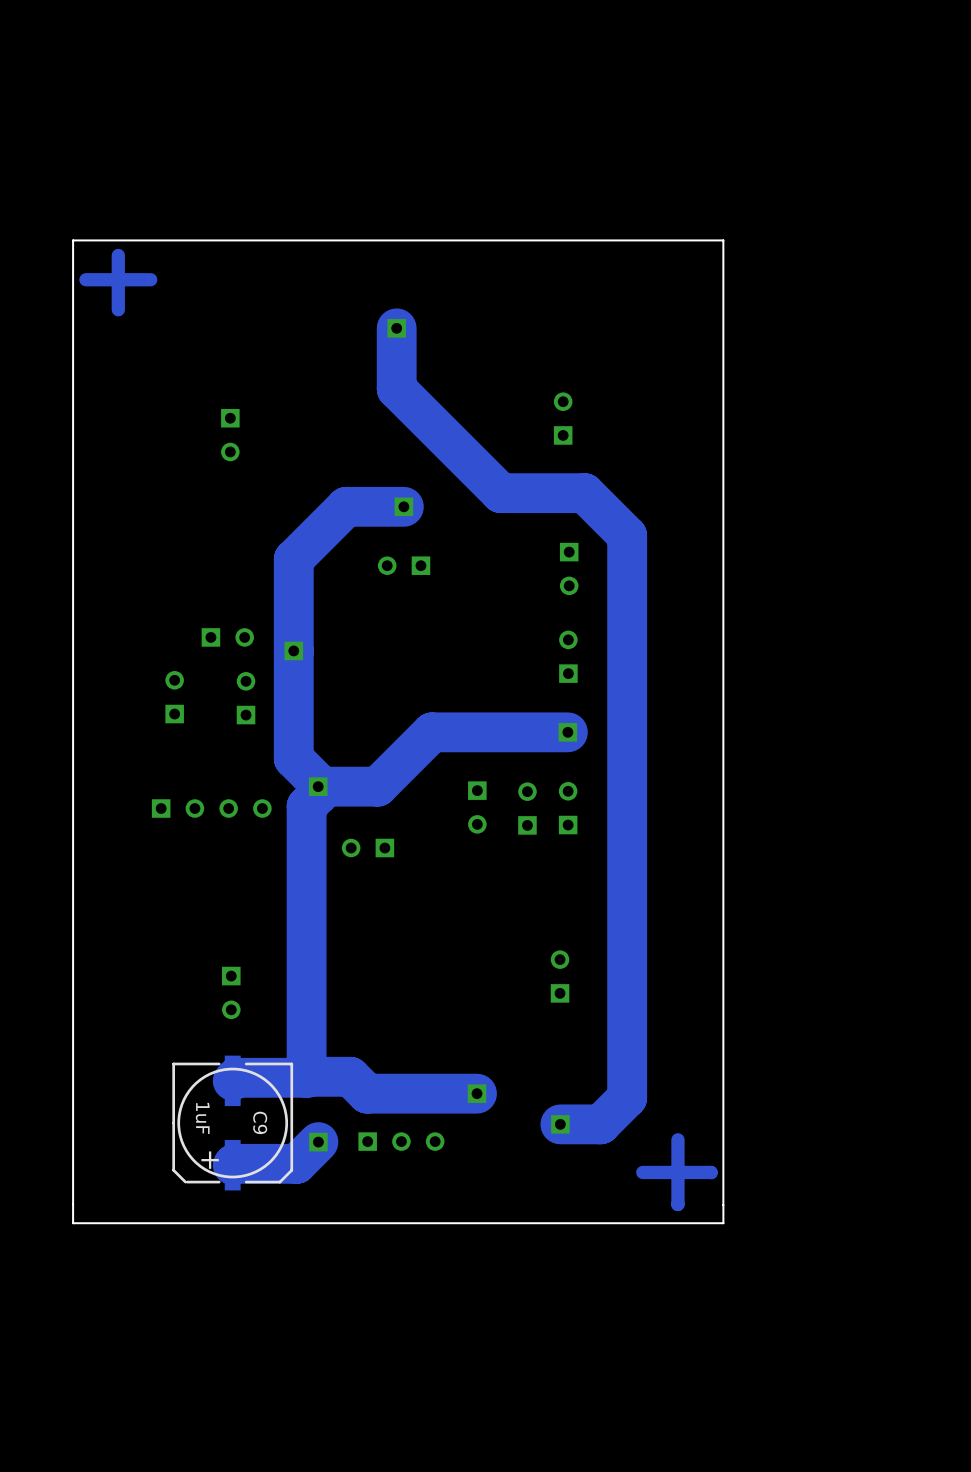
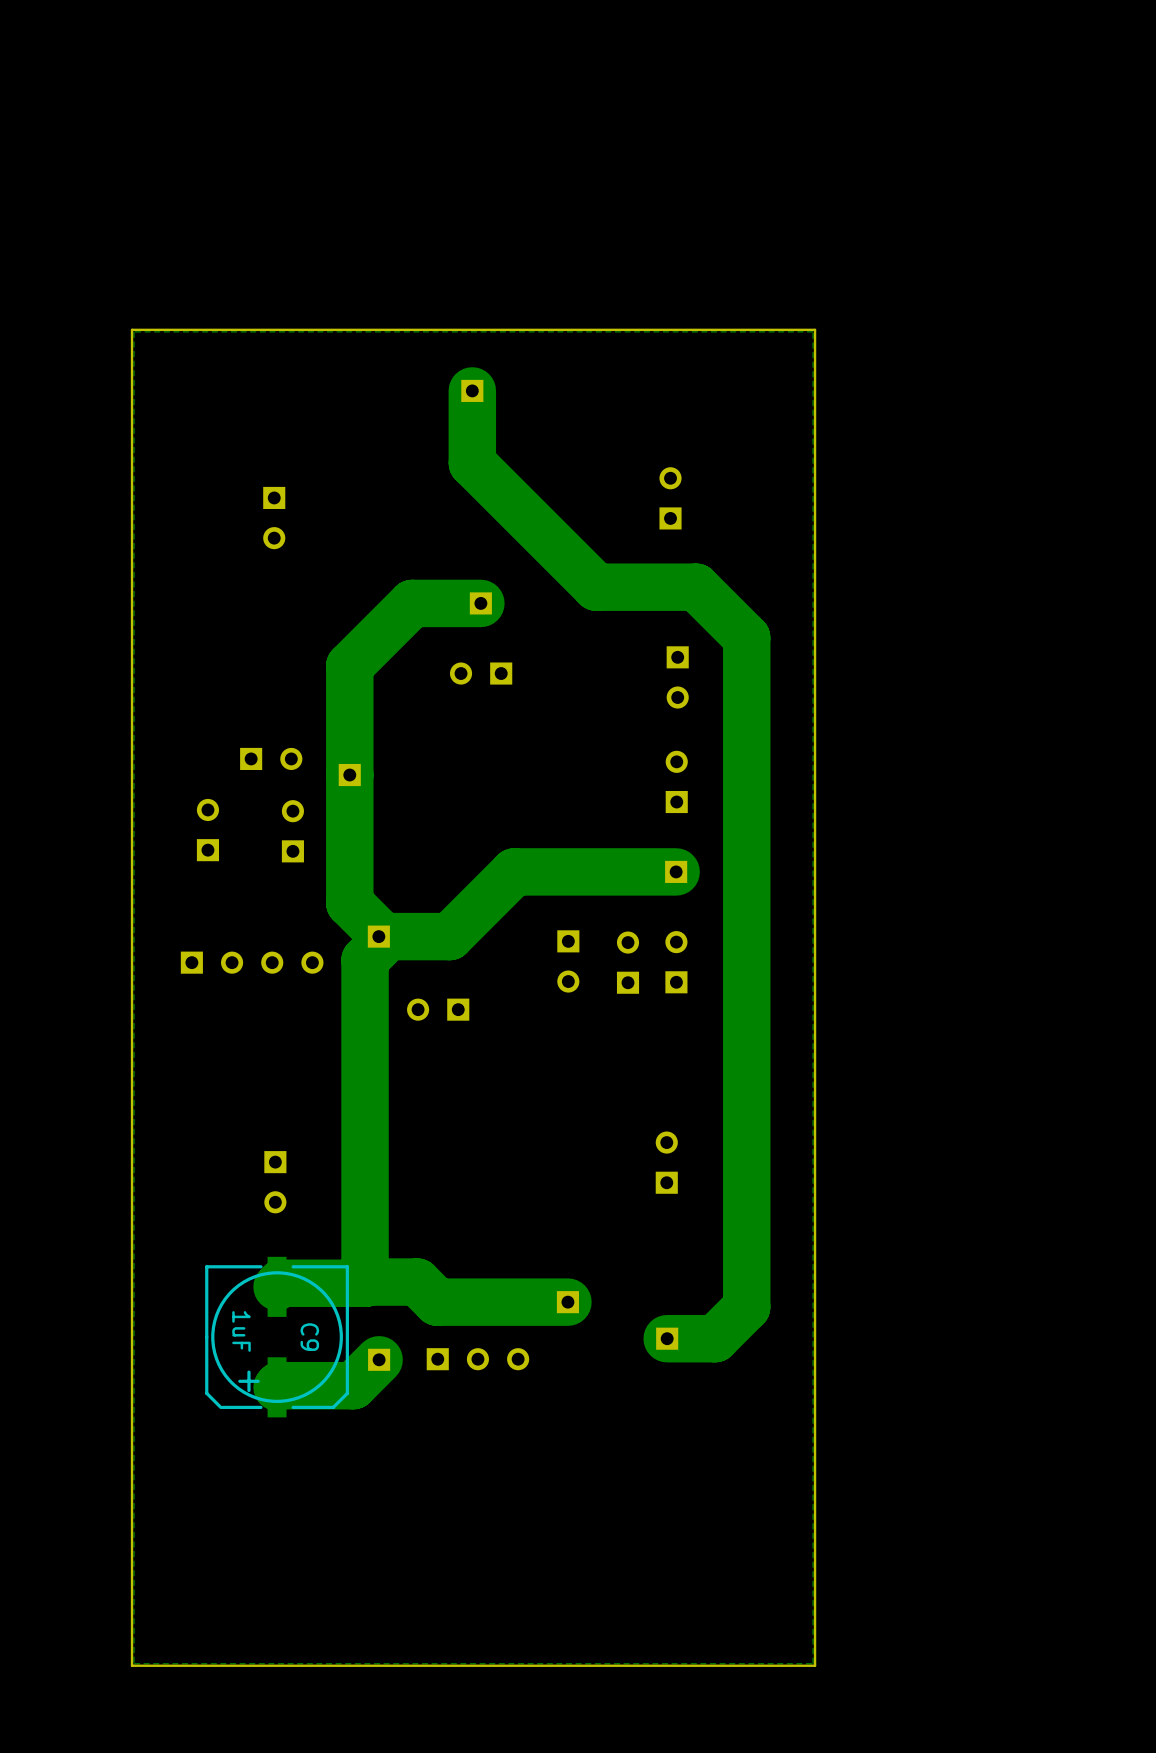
track: (118, 255) (118, 309) -> none
zone outline: none -> (813, 331) (813, 1663) (134, 1663) (134, 331) (813, 331)
track: (150, 279) (85, 279) -> none
track: (677, 1139) (677, 1204) -> none
track: (642, 1172) (711, 1172) -> none
board edge: (723, 1223) (73, 1223) (73, 240) (723, 240) (723, 1223) -> (815, 329) (815, 1665) (132, 1665) (132, 329) (815, 329)

